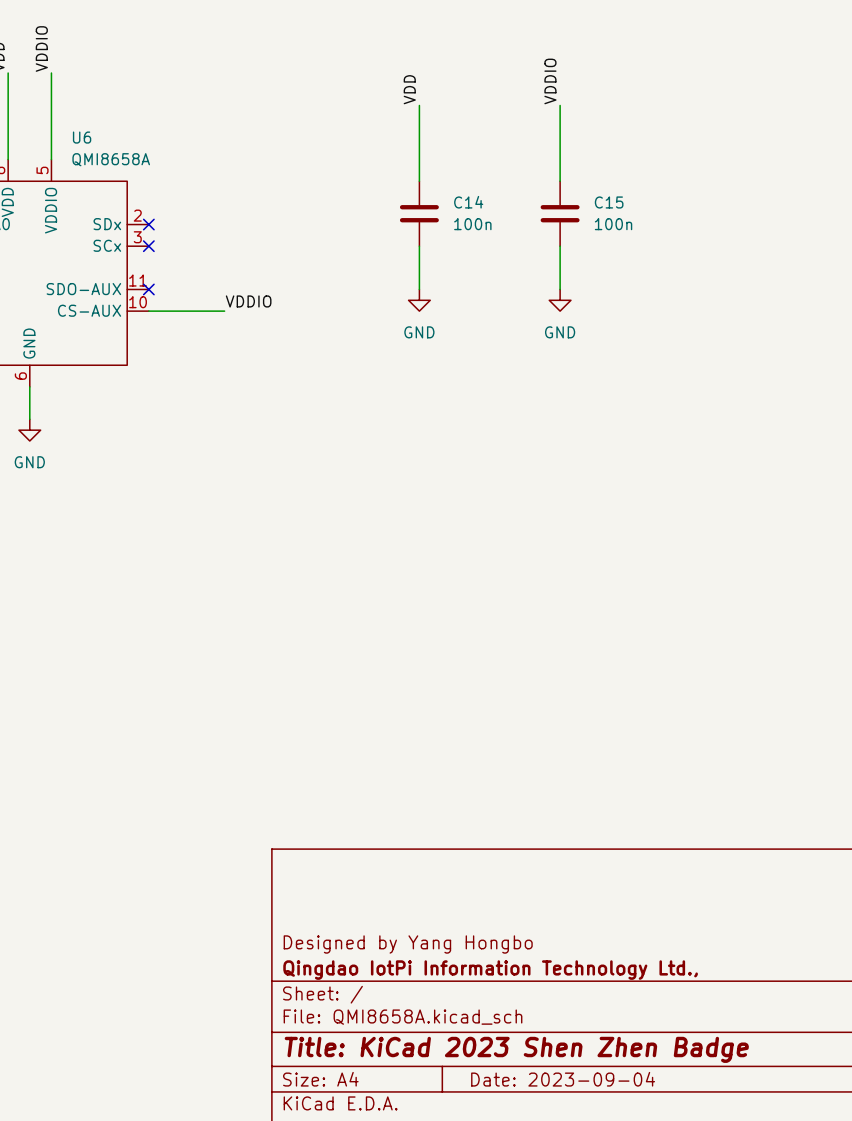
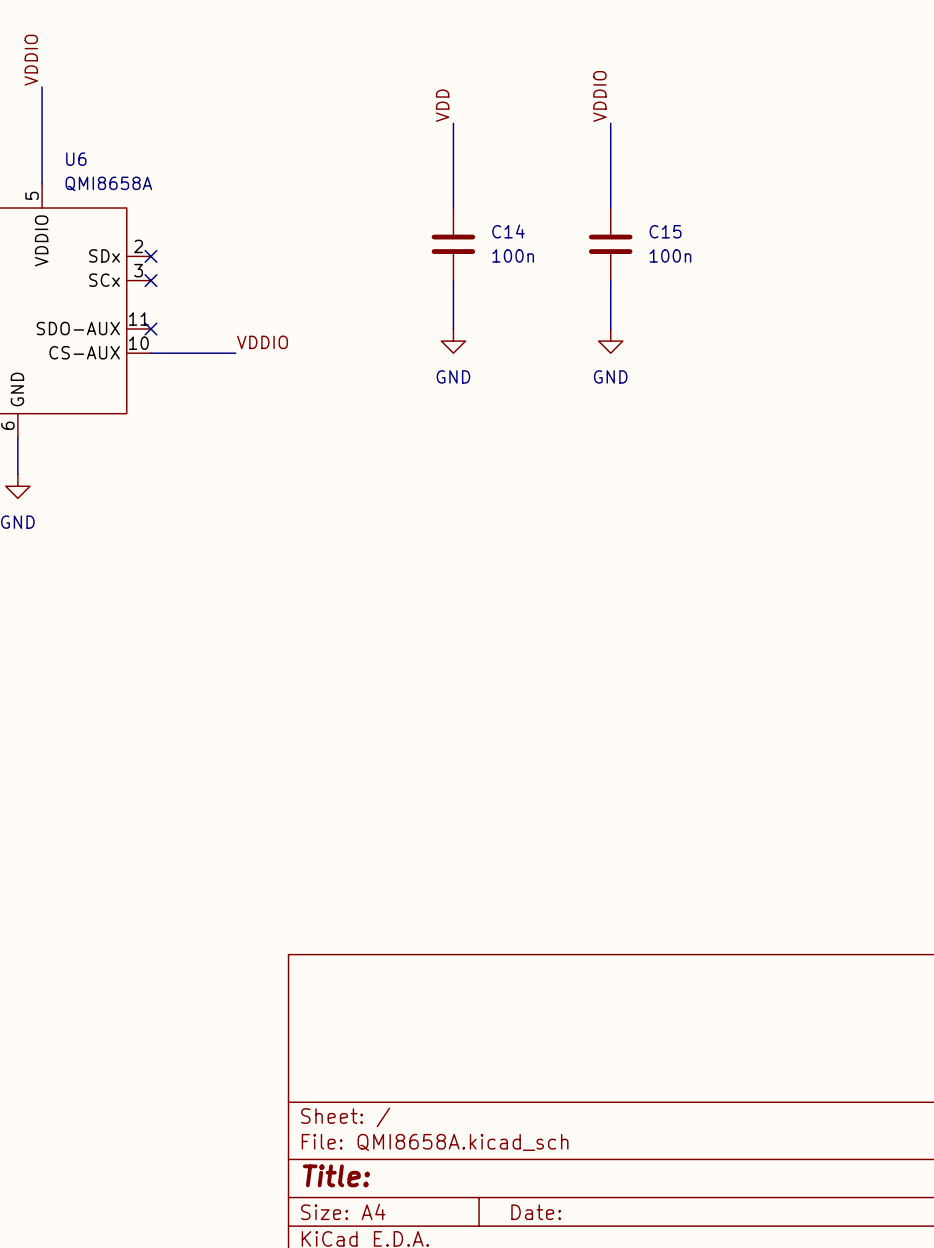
title block: Designed by Yang Hongbo (408, 944) -> none
title block: Qingdao IotPi Information Technology Ltd., (490, 970) -> none
title block: Title: KiCad 2023 Shen Zhen Badge (516, 1049) -> Title: (336, 1175)
title block: Date: 2023-09-04 (563, 1079) -> Date: (536, 1212)

